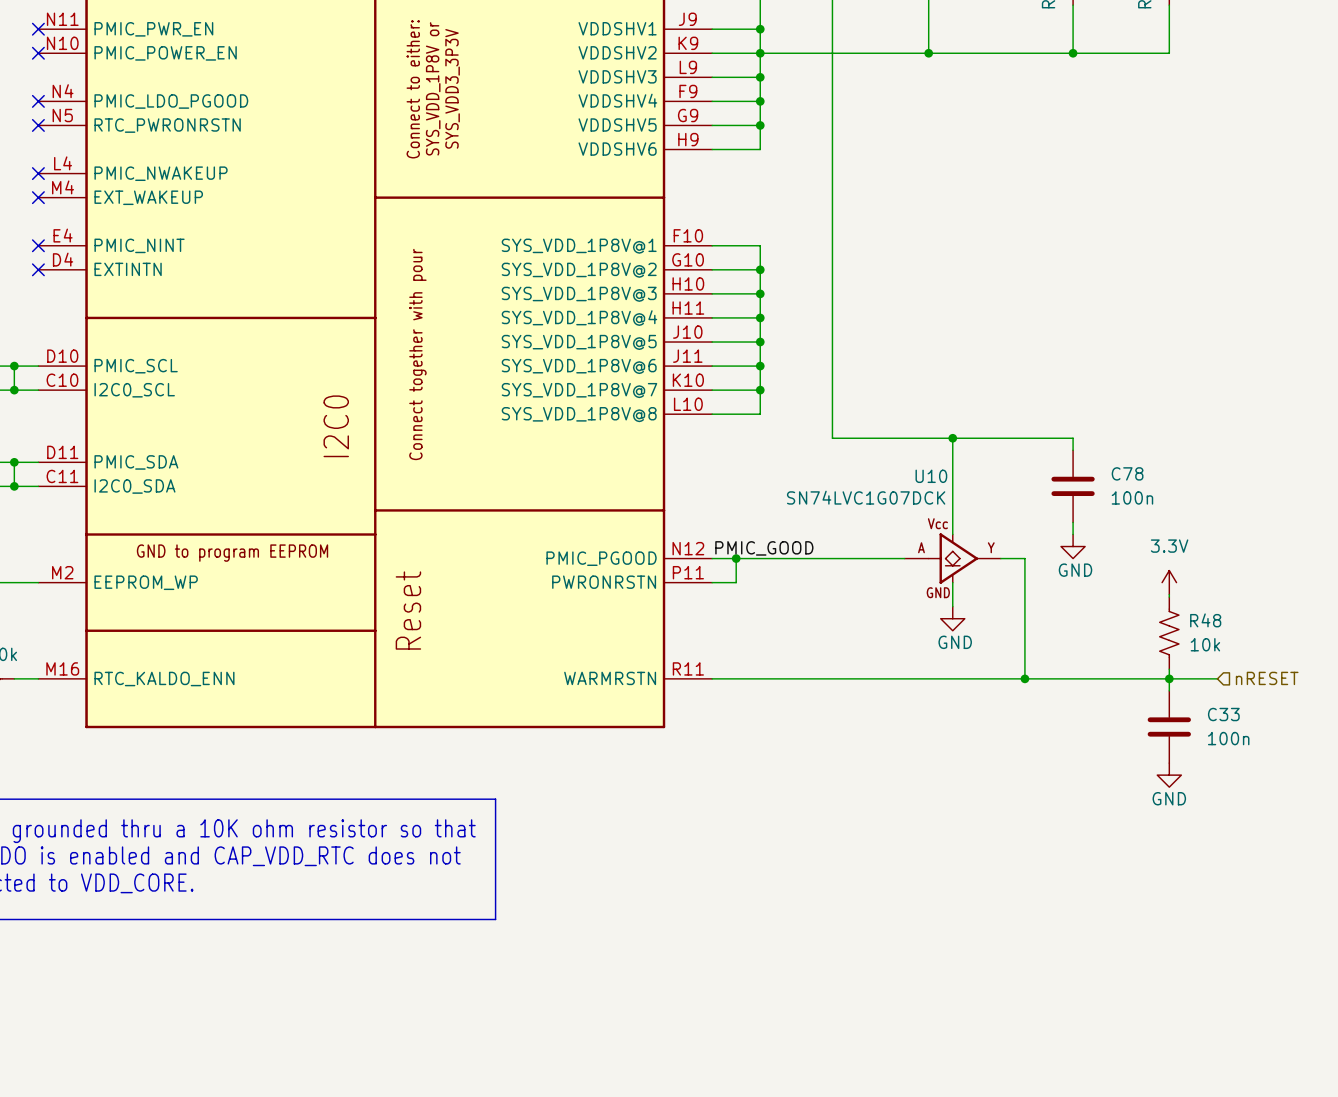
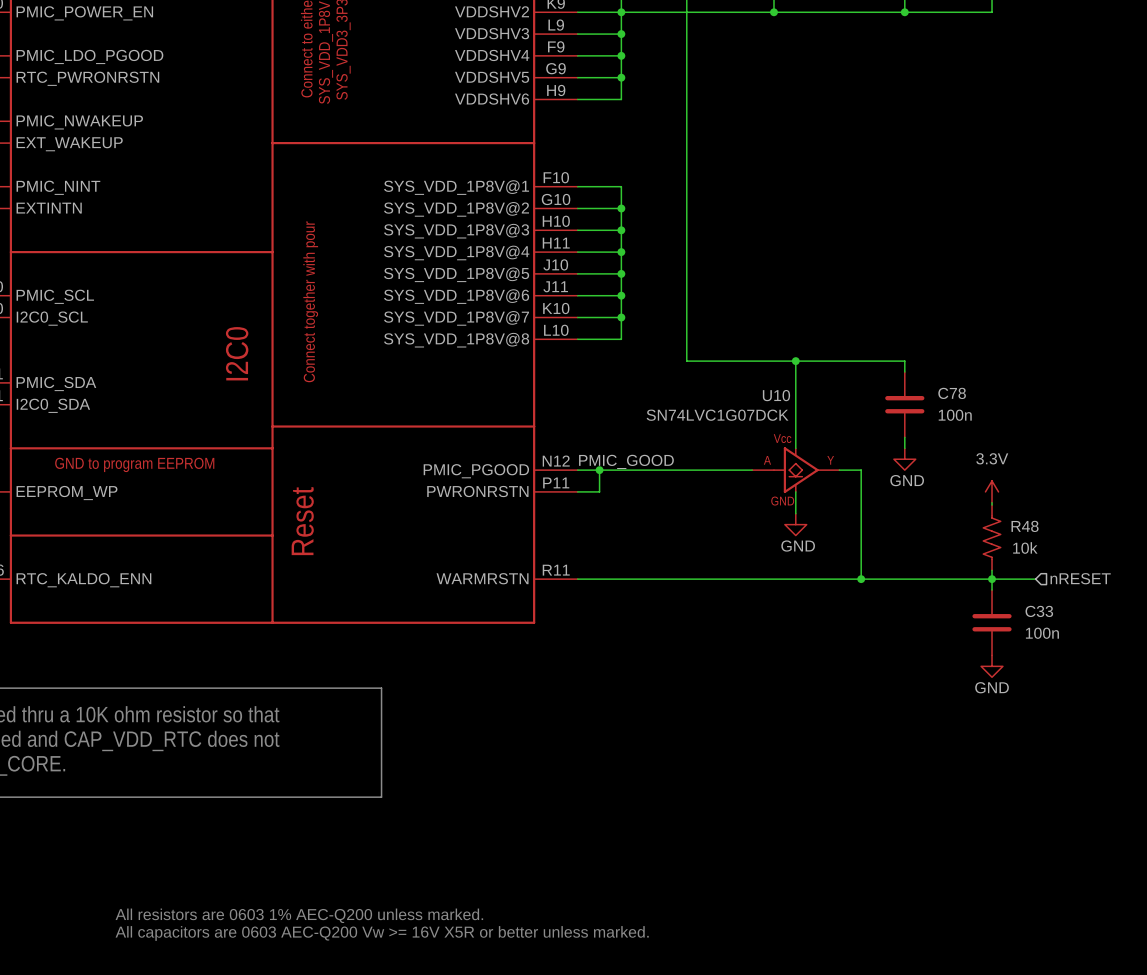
text: none -> All resistors are 0603 1% AEC-Q200 unless marked. (299, 915)
text: none -> All capacitors are 0603 AEC-Q200 Vw >= 16V X5R or better unless marked. (382, 933)

